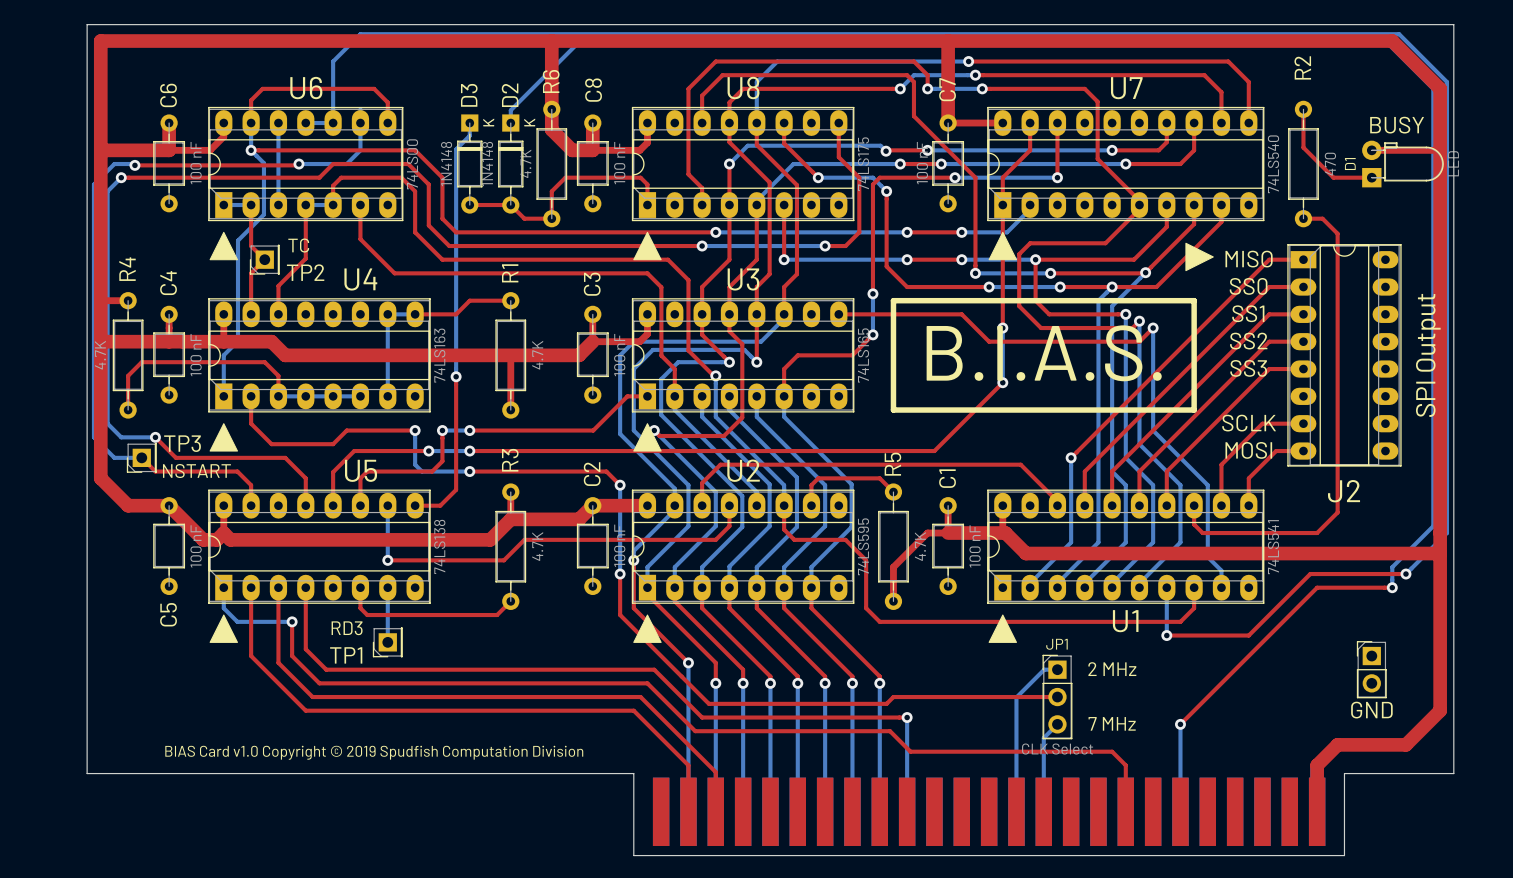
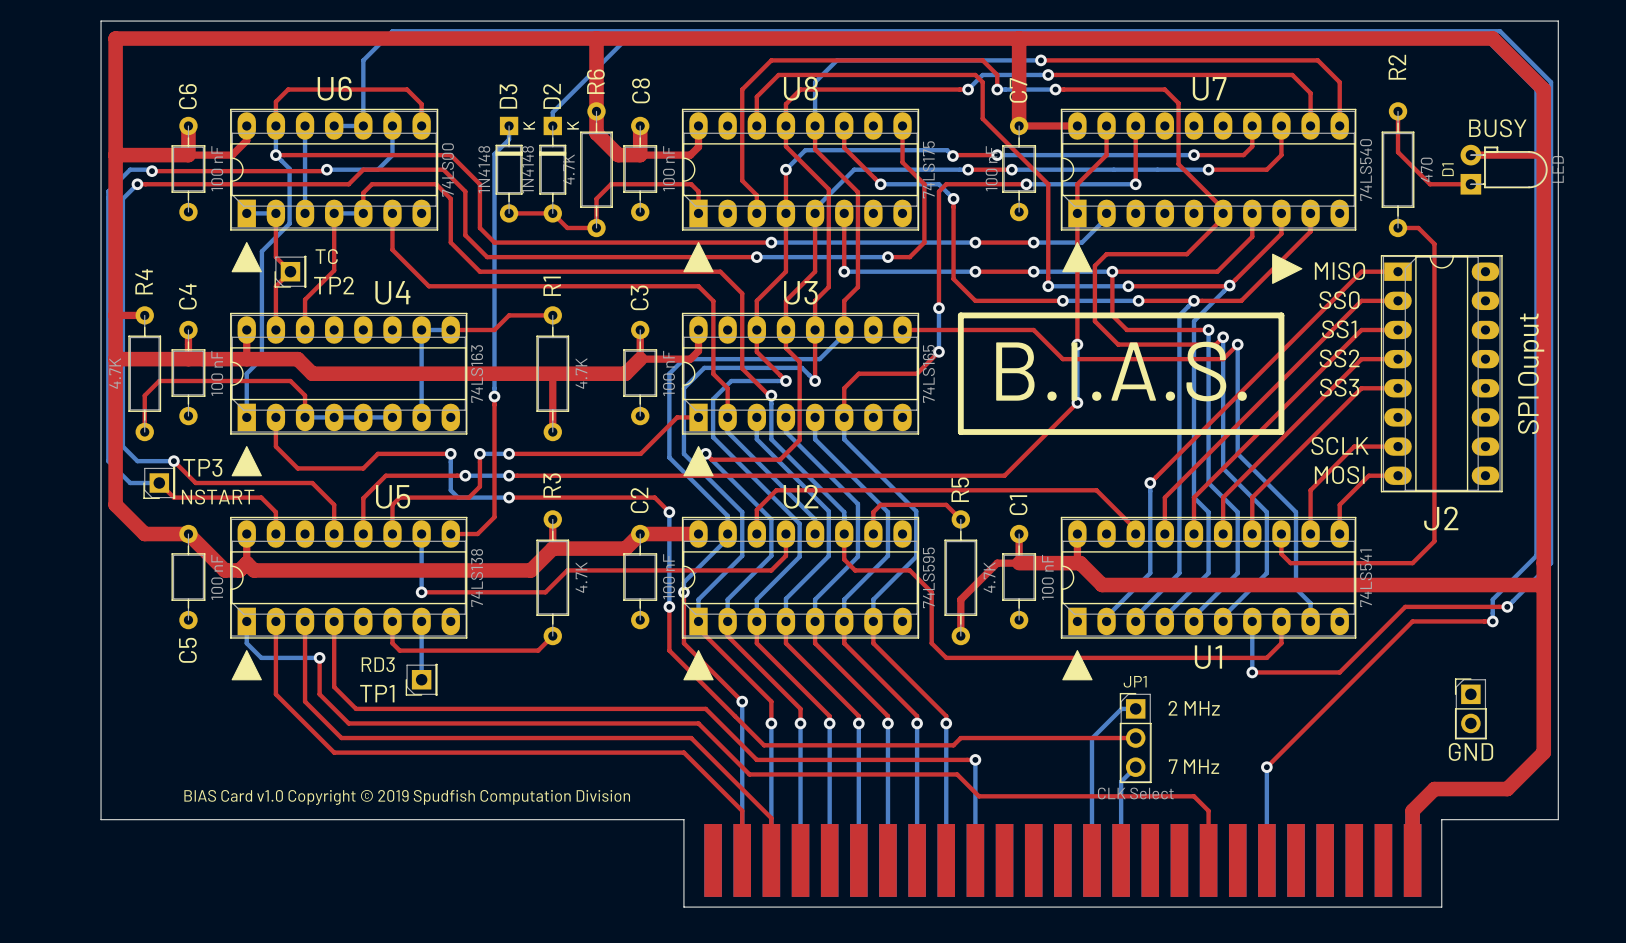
J2 value: SPI Output (1428, 355) -> SPI Ouput (1531, 373)

